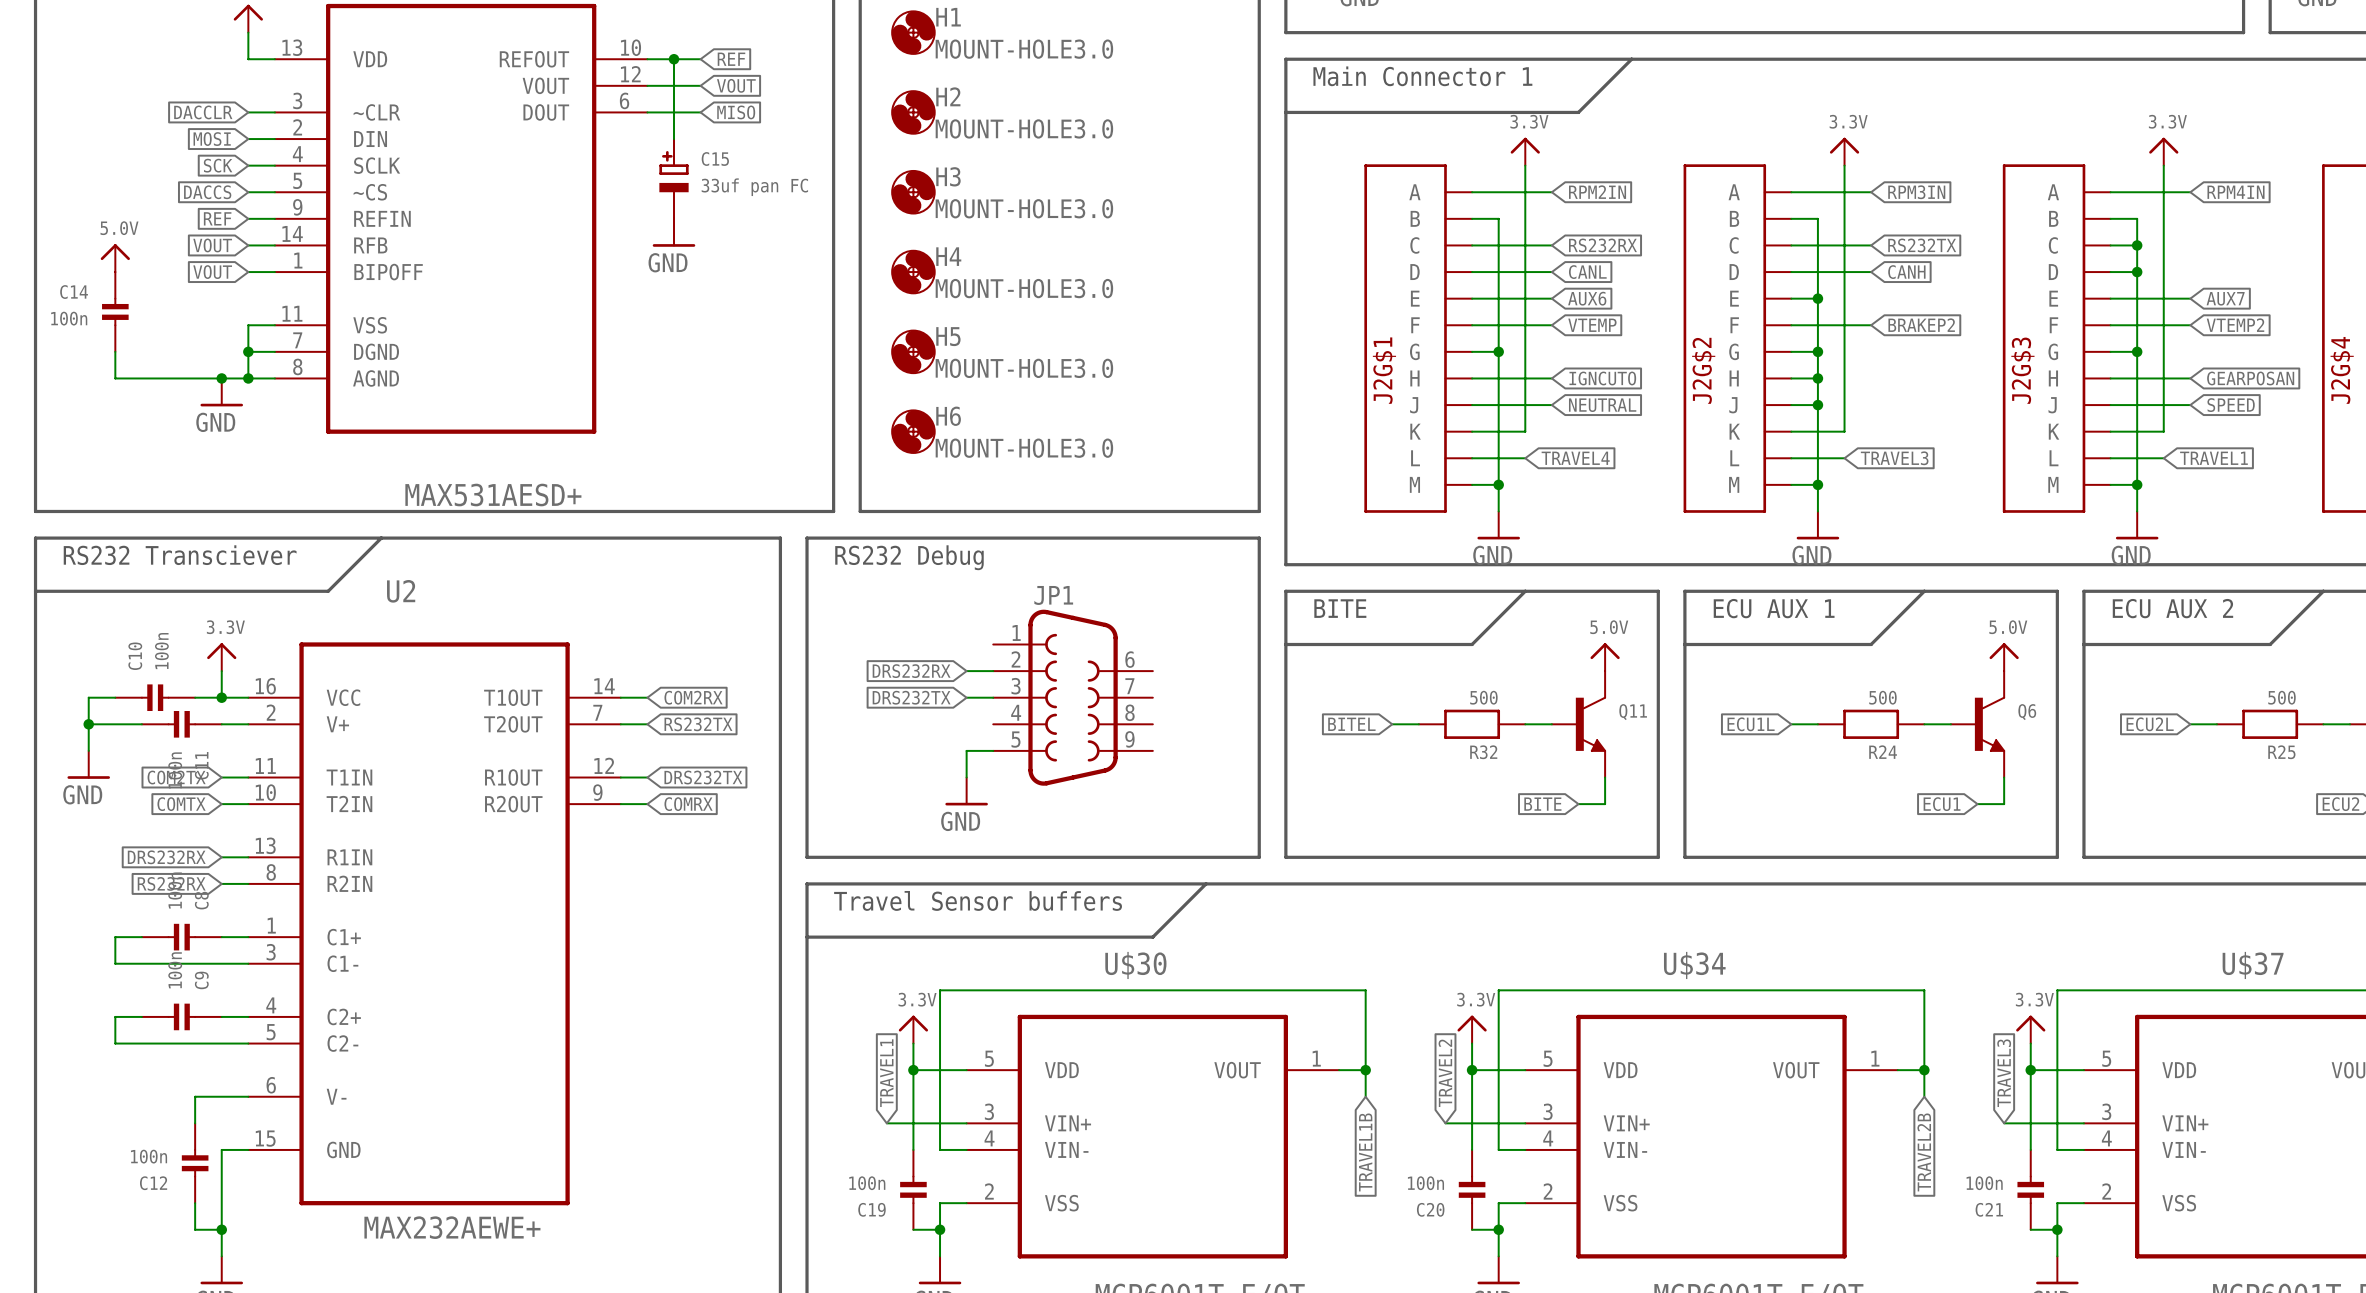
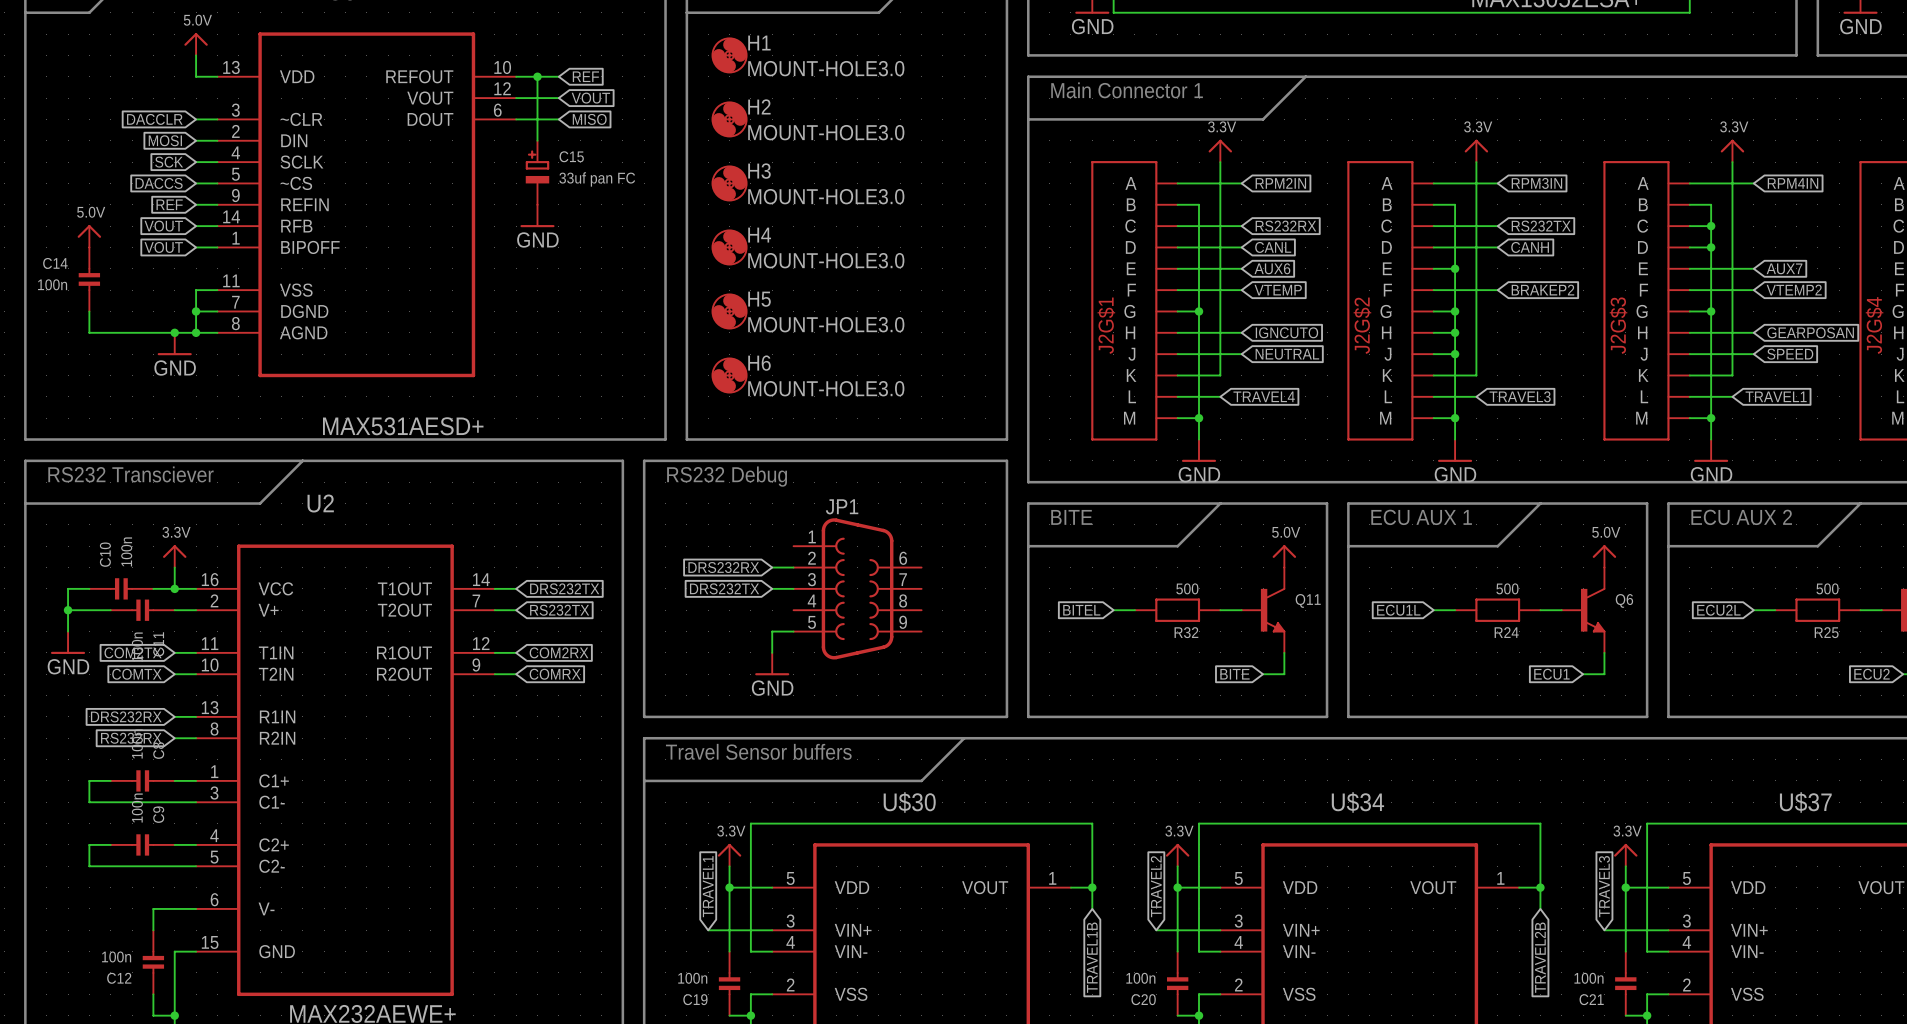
global label: COM2RX (693, 697) -> DRS232TX (564, 588)
global label: DRS232TX (703, 777) -> COM2RX (559, 652)

